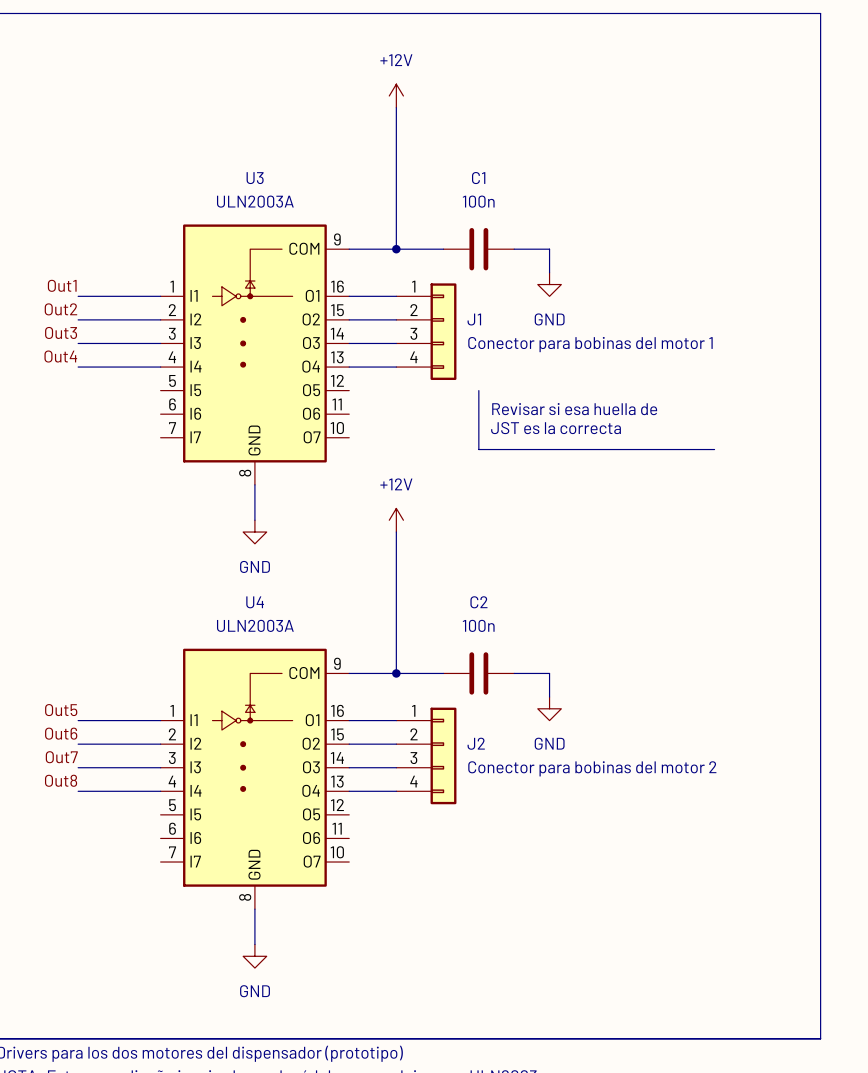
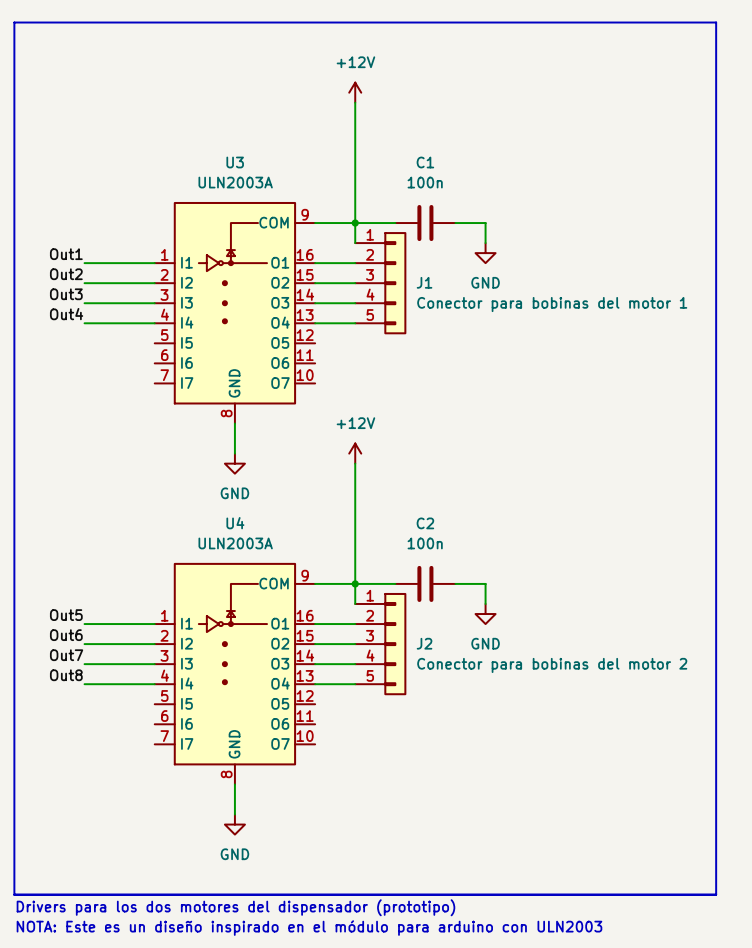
wire: none -> (355, 223) (355, 243)
J1 symbol: [396, 283, 457, 381] -> [355, 232, 407, 335]
line: (478, 390) (478, 449) (714, 449) -> none
text: Revisar si esa huella de (574, 409) -> none
text: JST es la correcta (556, 428) -> none
wire: none -> (355, 583) (355, 603)
J2 symbol: [396, 707, 457, 805] -> [355, 592, 407, 696]

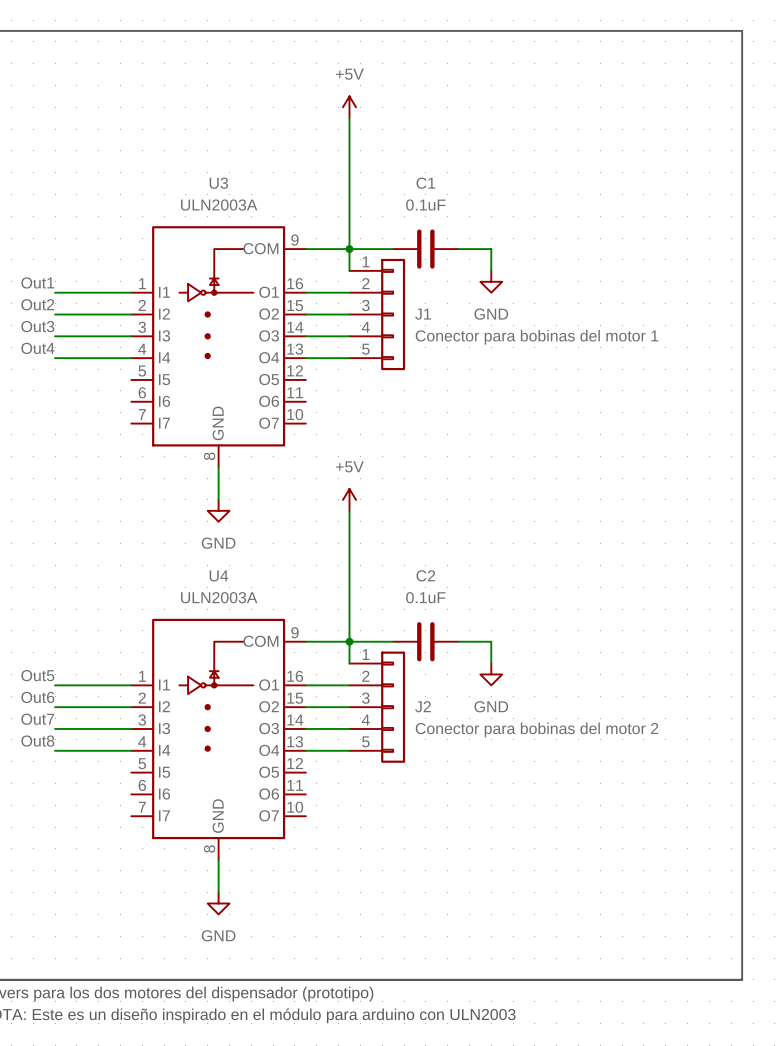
power symbol: +12V (355, 92) -> +5V (349, 107)
C1 value: 100n (425, 182) -> 0.1uF (425, 205)
power symbol: +12V (355, 453) -> +5V (349, 499)
C2 value: 100n (425, 543) -> 0.1uF (425, 597)

